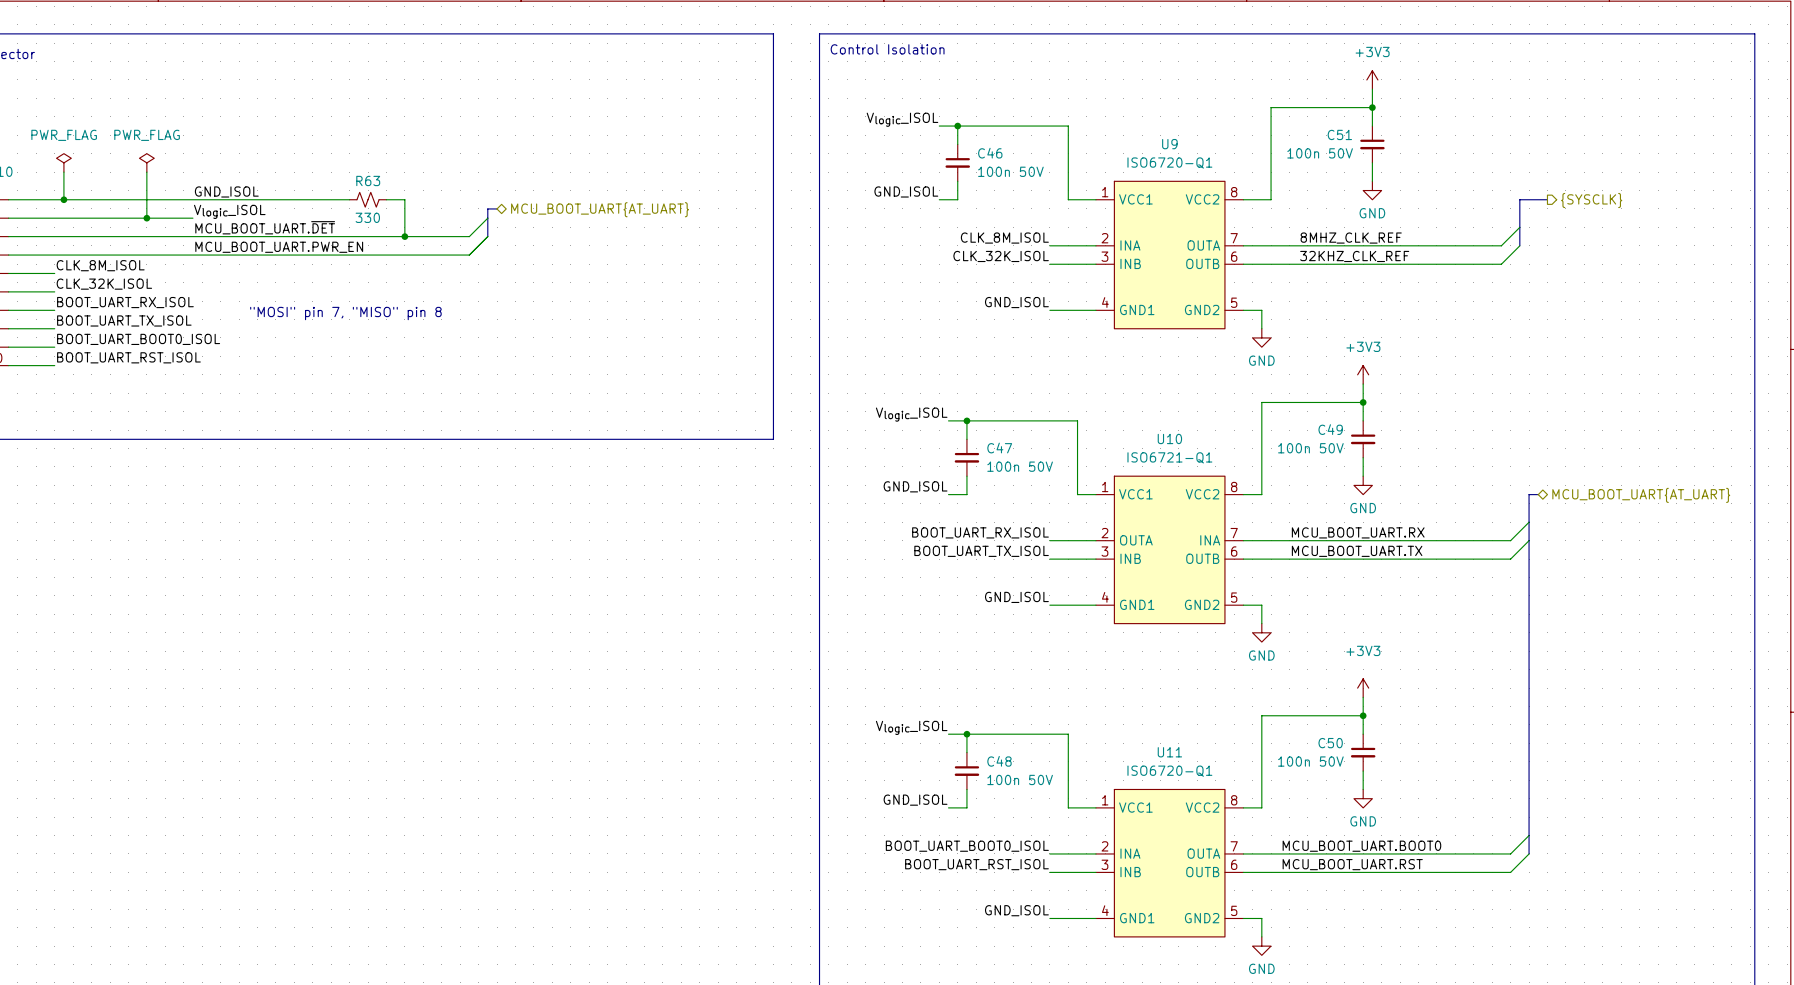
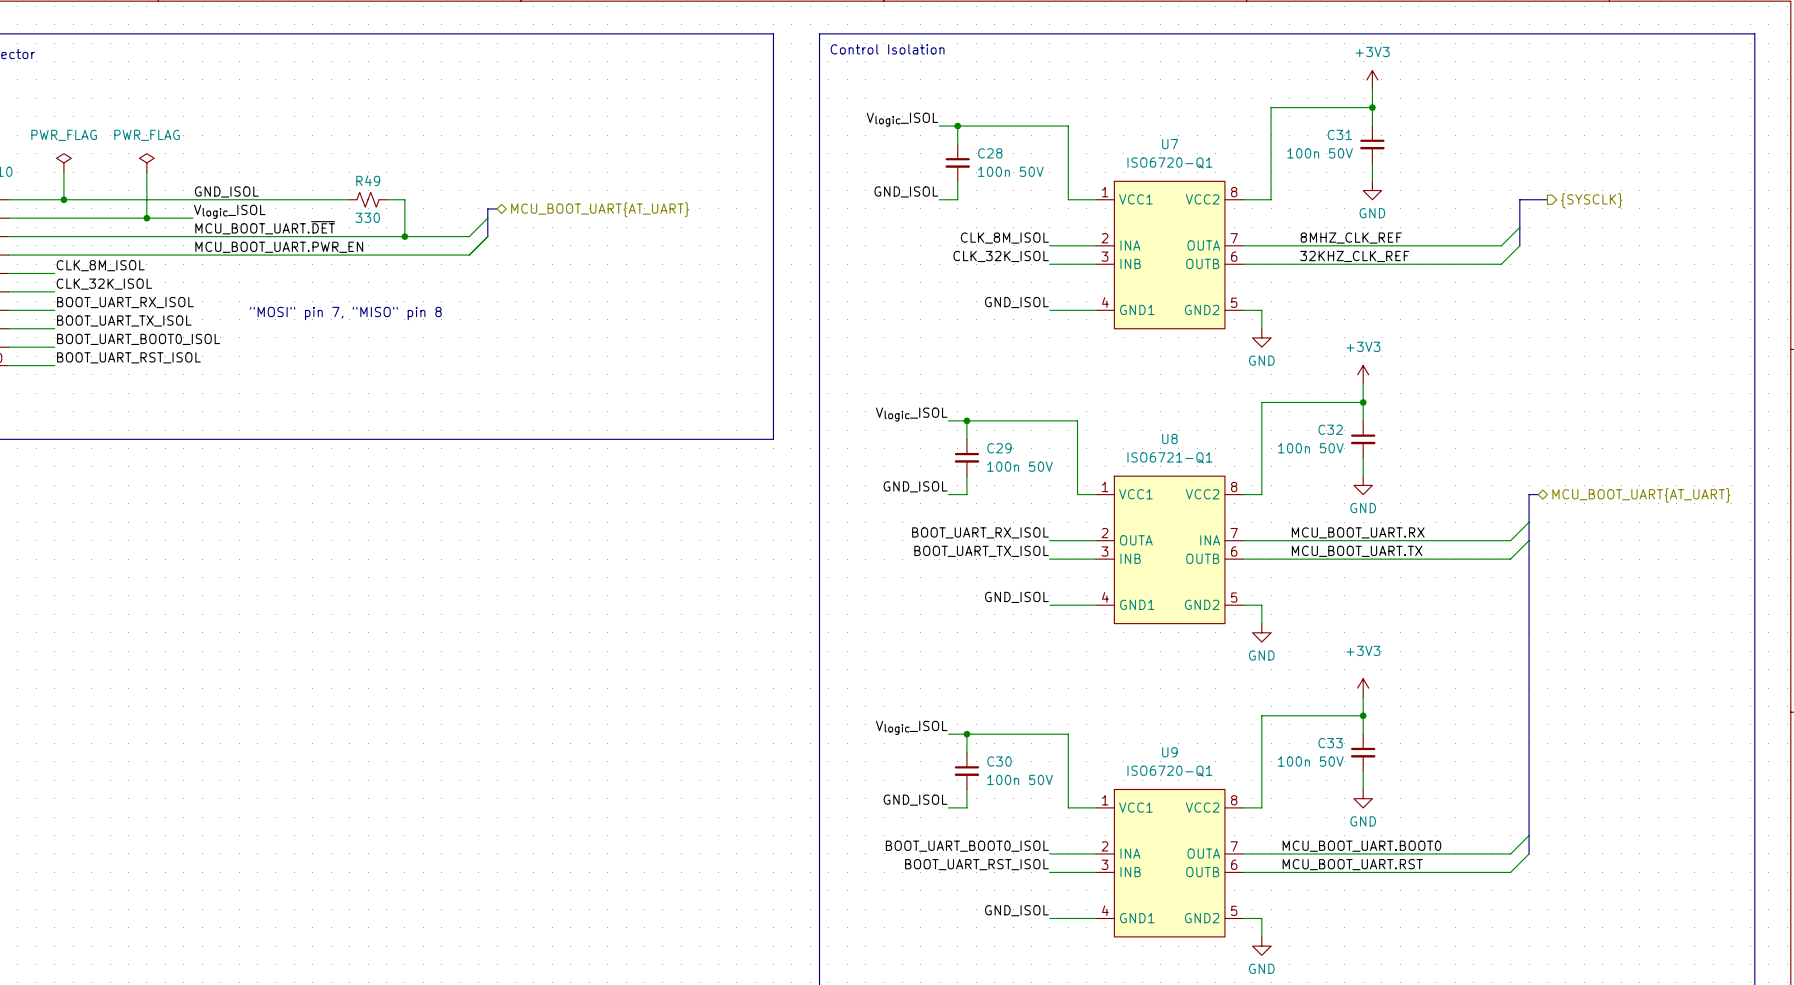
C51 name: C51 (1339, 134) -> C31 (1339, 134)
U9 name: U9 (1169, 144) -> U7 (1170, 144)
C46 name: C46 (990, 153) -> C28 (990, 153)
R63 name: R63 (368, 180) -> R49 (368, 180)
C49 name: C49 (1330, 429) -> C32 (1330, 429)
U10 name: U10 (1169, 438) -> U8 (1169, 438)
C47 name: C47 (999, 448) -> C29 (999, 448)
C50 name: C50 (1330, 743) -> C33 (1330, 743)
U11 name: U11 (1169, 752) -> U9 (1169, 752)
C48 name: C48 (999, 761) -> C30 (999, 761)

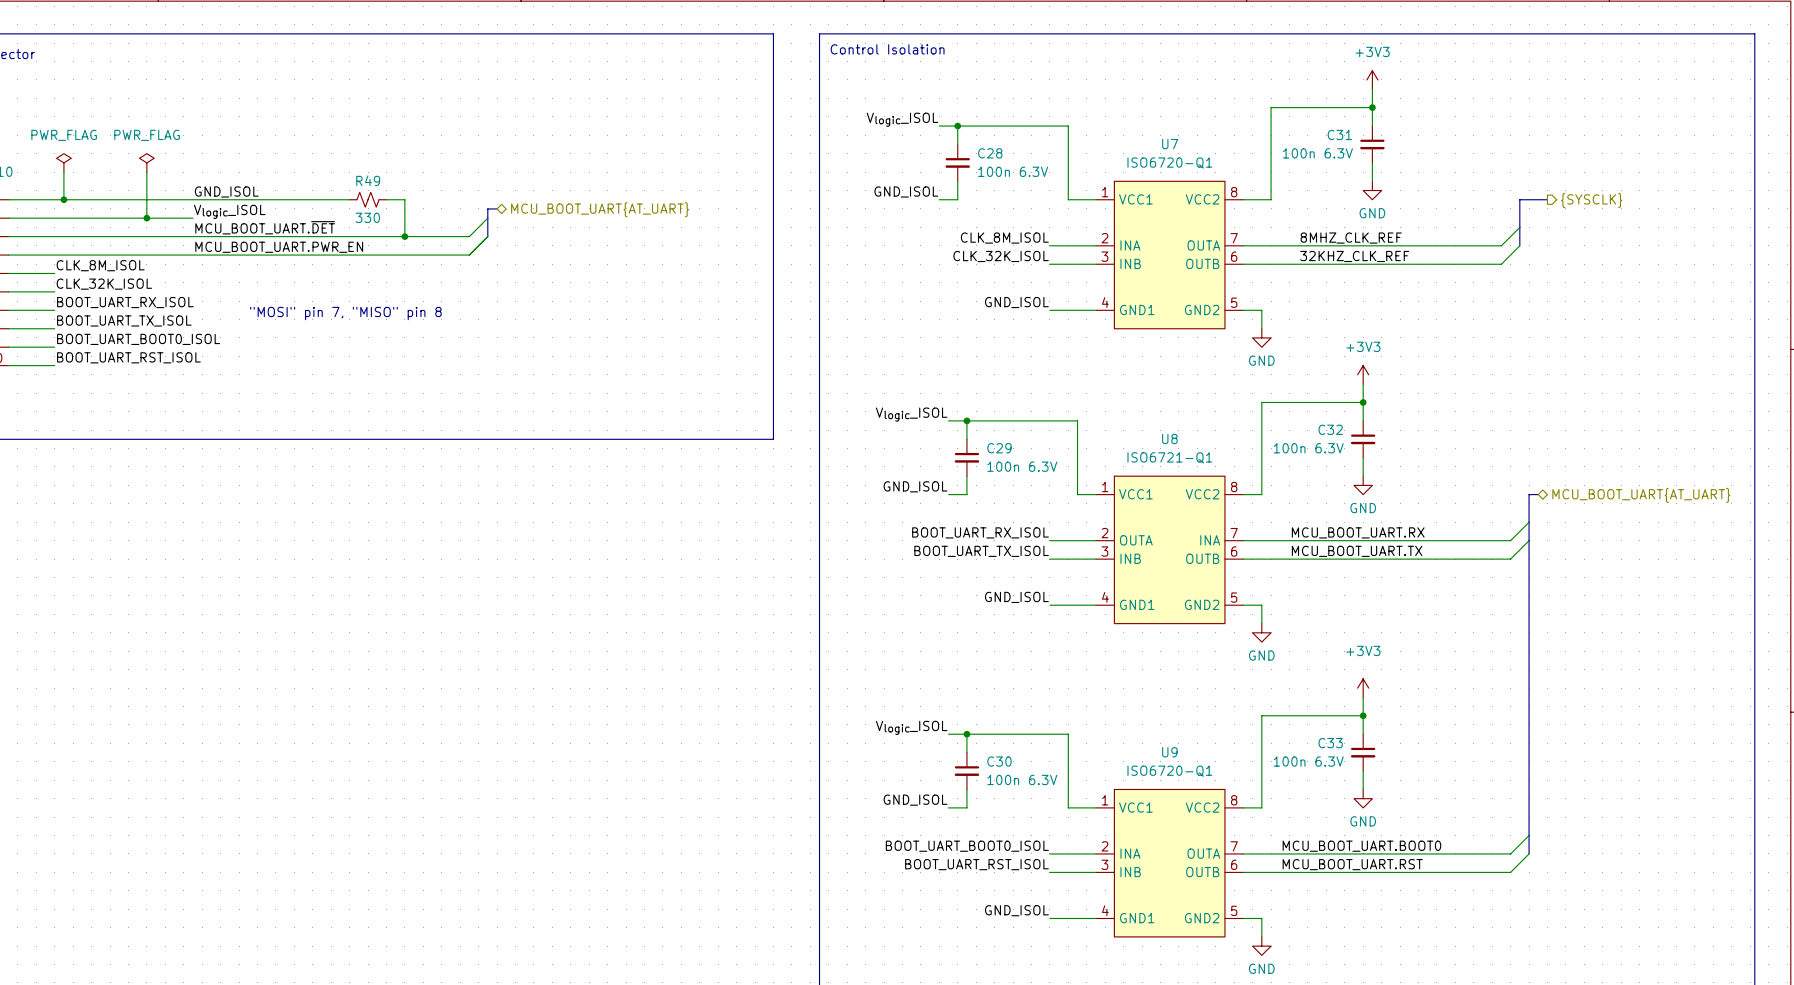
C31 value: 100n 50V (1320, 153) -> 100n 6.3V (1317, 153)
C28 value: 100n 50V (1010, 171) -> 100n 6.3V (1013, 171)
C32 value: 100n 50V (1310, 448) -> 100n 6.3V (1308, 448)
C29 value: 100n 50V (1020, 466) -> 100n 6.3V (1022, 466)
C33 value: 100n 50V (1310, 761) -> 100n 6.3V (1308, 761)
C30 value: 100n 50V (1020, 779) -> 100n 6.3V (1022, 779)

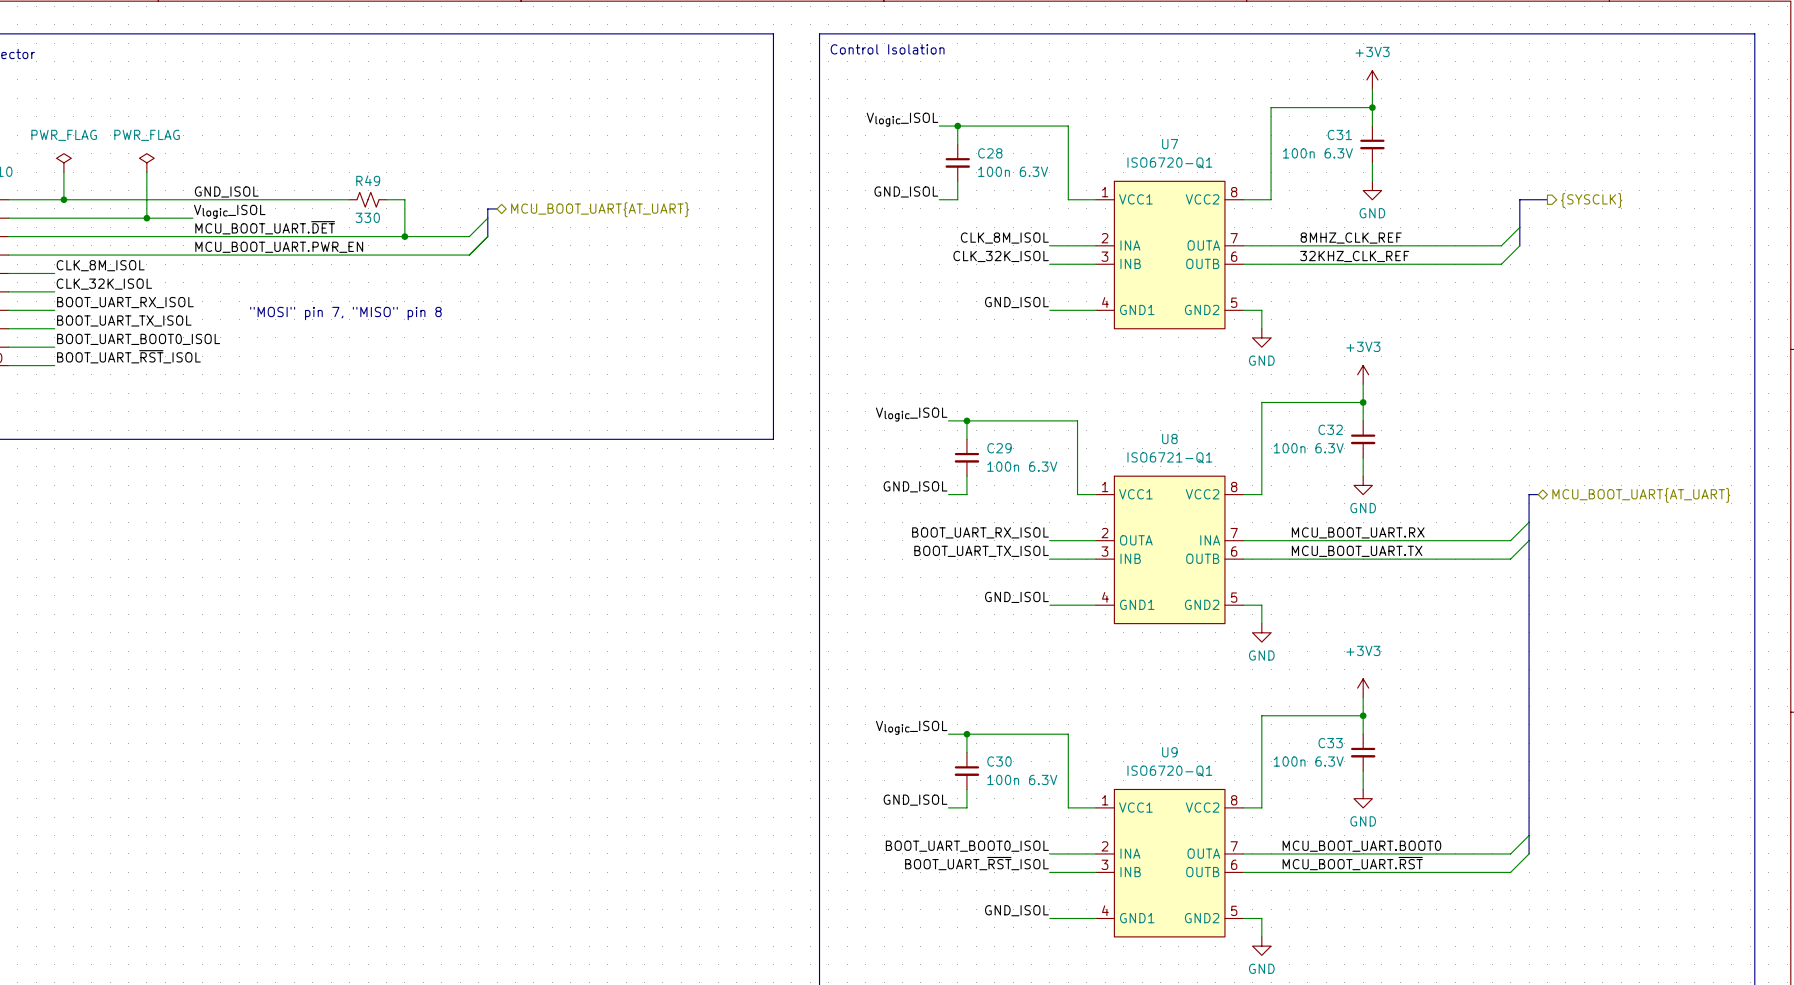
label: BOOT_UART_RST_ISOL (128, 357) -> BOOT_UART_~{RST}_ISOL (128, 356)
label: BOOT_UART_RST_ISOL (976, 864) -> BOOT_UART_~{RST}_ISOL (976, 863)
label: MCU_BOOT_UART.RST (1352, 864) -> MCU_BOOT_UART.~{RST} (1352, 863)

